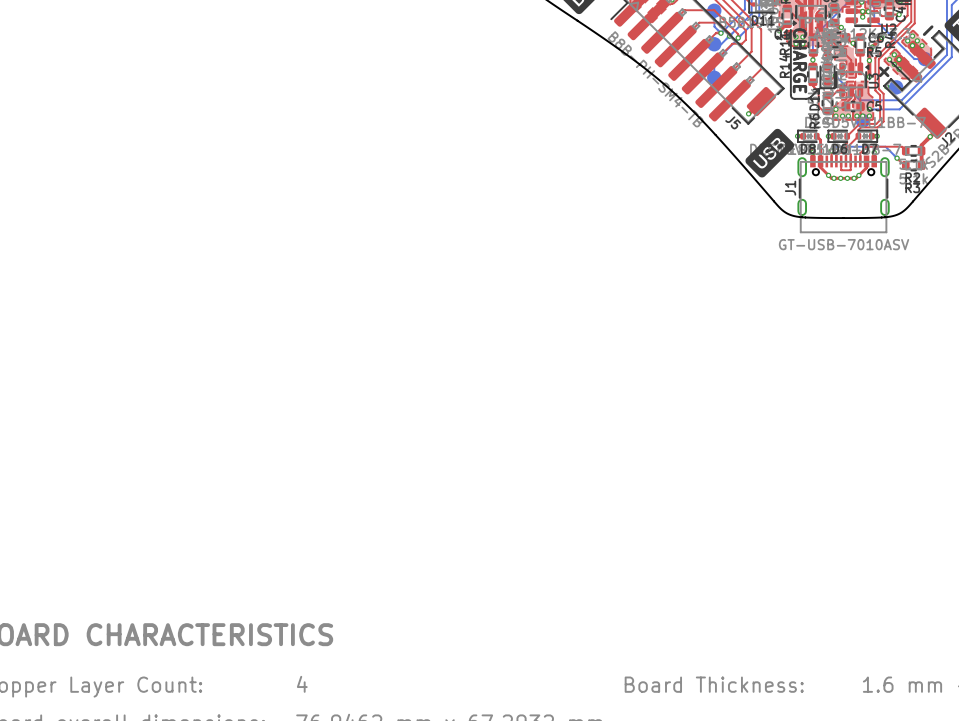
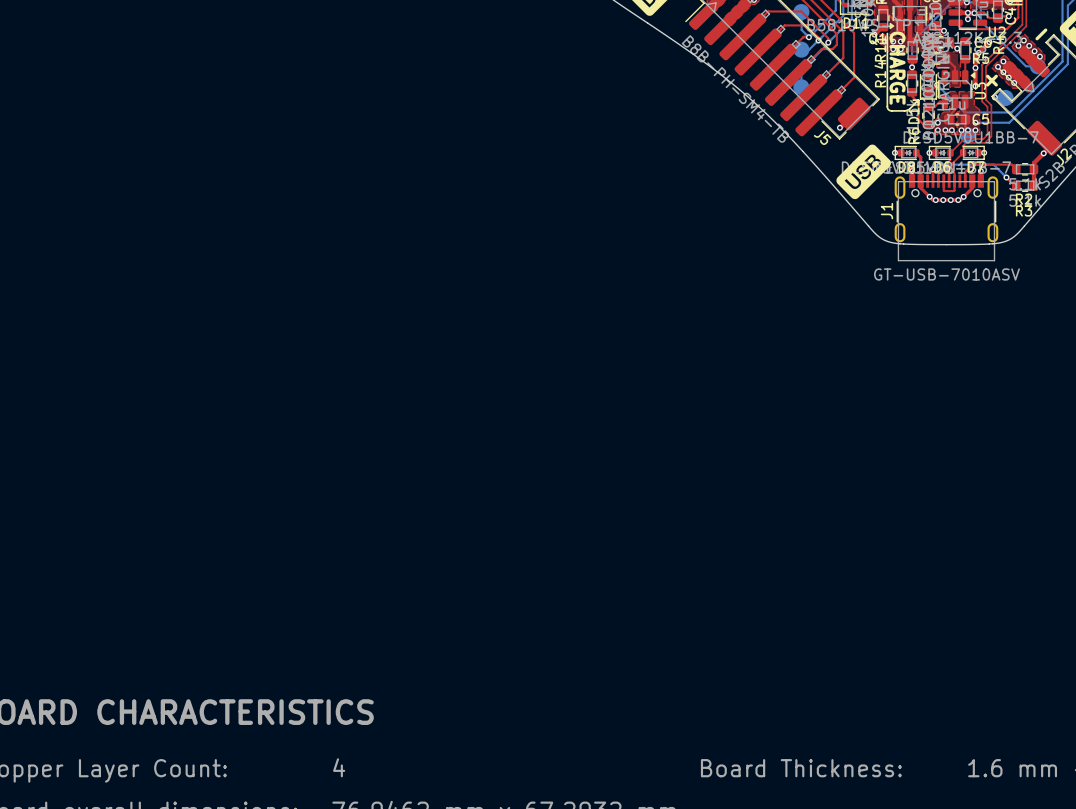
via: (912, 45) -> none
via: none -> (1039, 56)
via: (899, 59) -> none
via: none -> (1014, 82)

